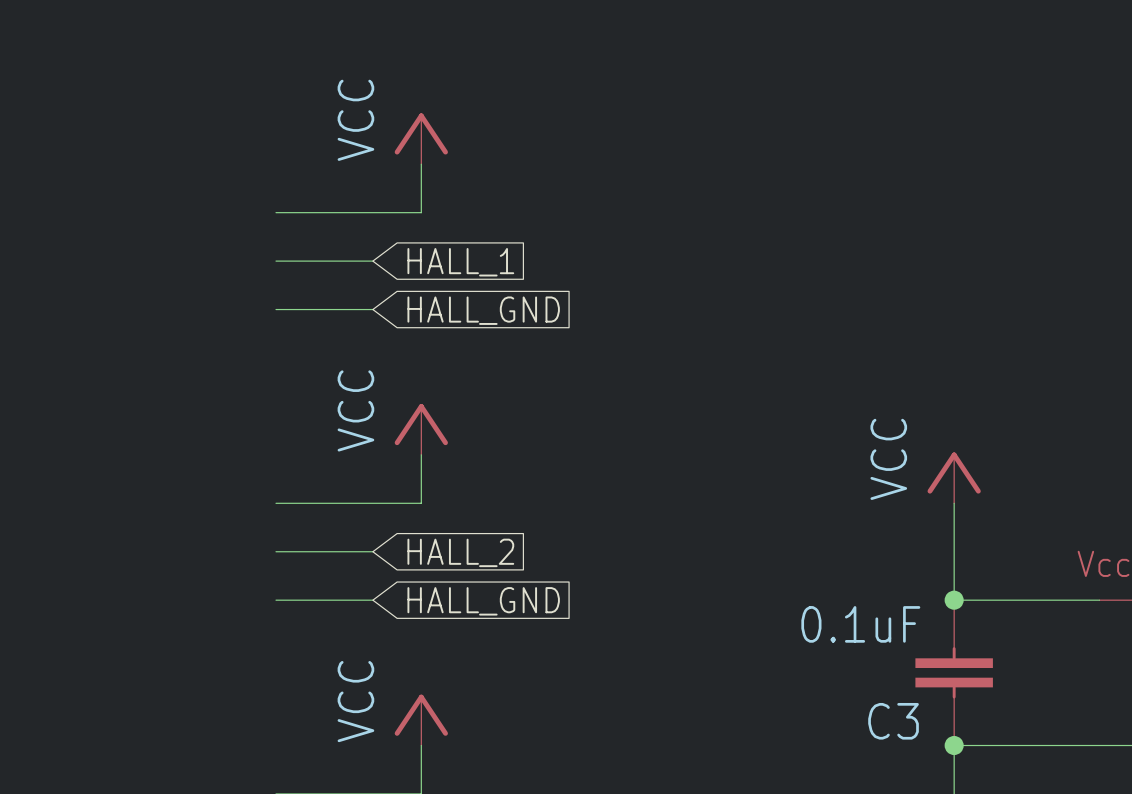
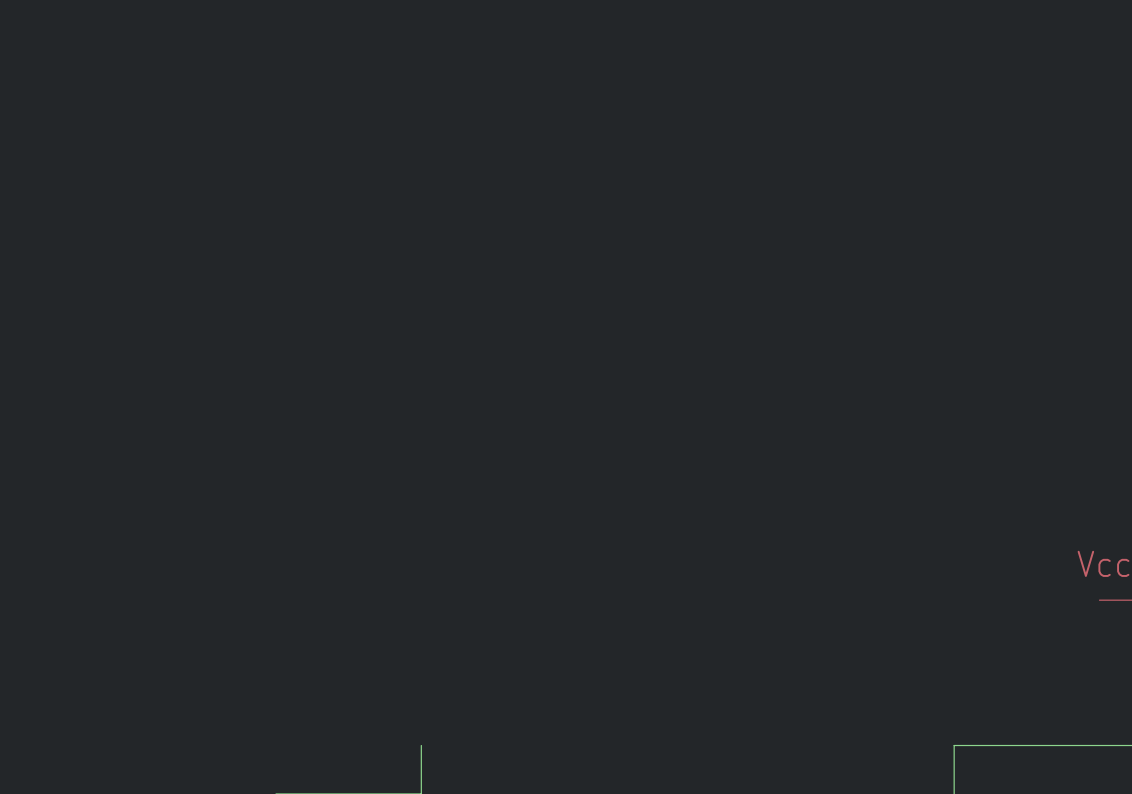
power symbol: VCC (421, 138) -> none
wire: (421, 164) (421, 212) (276, 212) -> none
wire: (276, 261) (372, 261) -> none
global label: HALL_1 (460, 262) -> none
wire: (276, 309) (372, 309) -> none
global label: HALL_GND (483, 310) -> none
power symbol: VCC (421, 429) -> none
wire: (421, 454) (421, 503) (276, 503) -> none
power symbol: VCC (954, 477) -> none
wire: (954, 503) (954, 600) (1099, 600) -> none
wire: (276, 551) (372, 551) -> none
global label: HALL_2 (460, 552) -> none
wire: (276, 600) (372, 600) -> none
junction: (954, 600) -> none
global label: HALL_GND (483, 601) -> none
C3: 0.1uF (954, 672) -> none
power symbol: VCC (421, 720) -> none
junction: (954, 745) -> none

